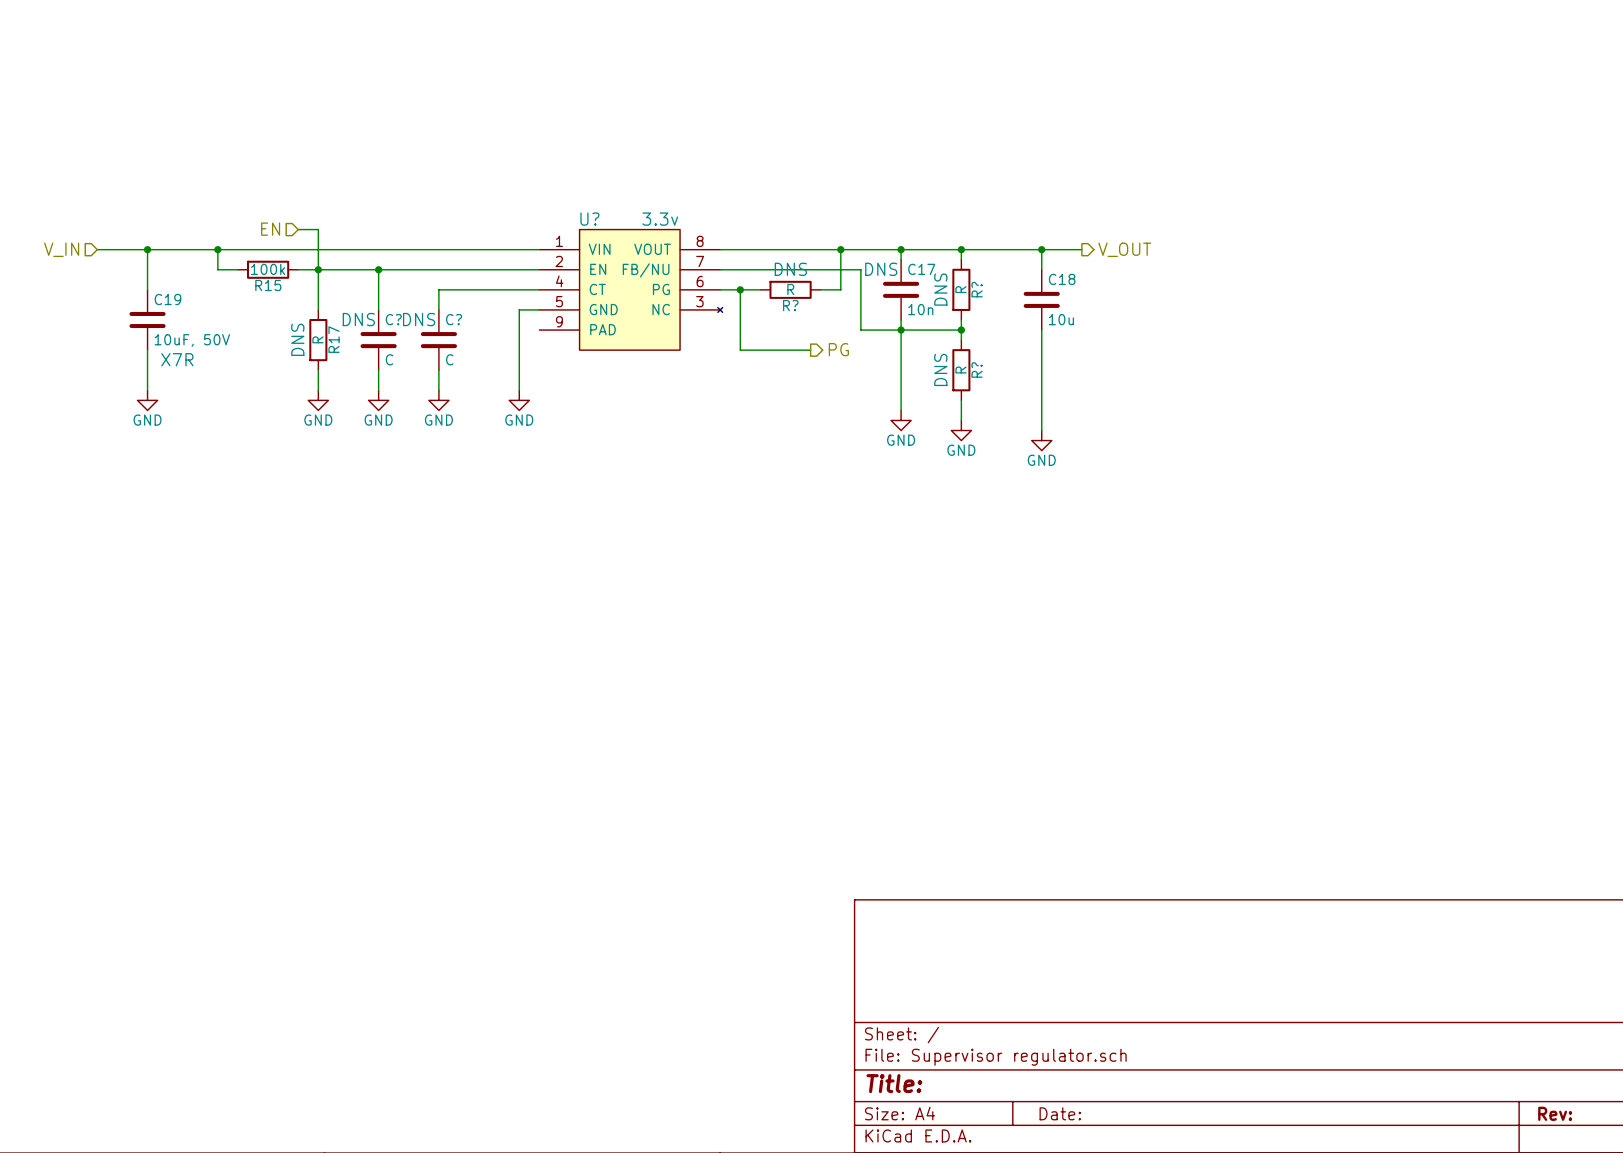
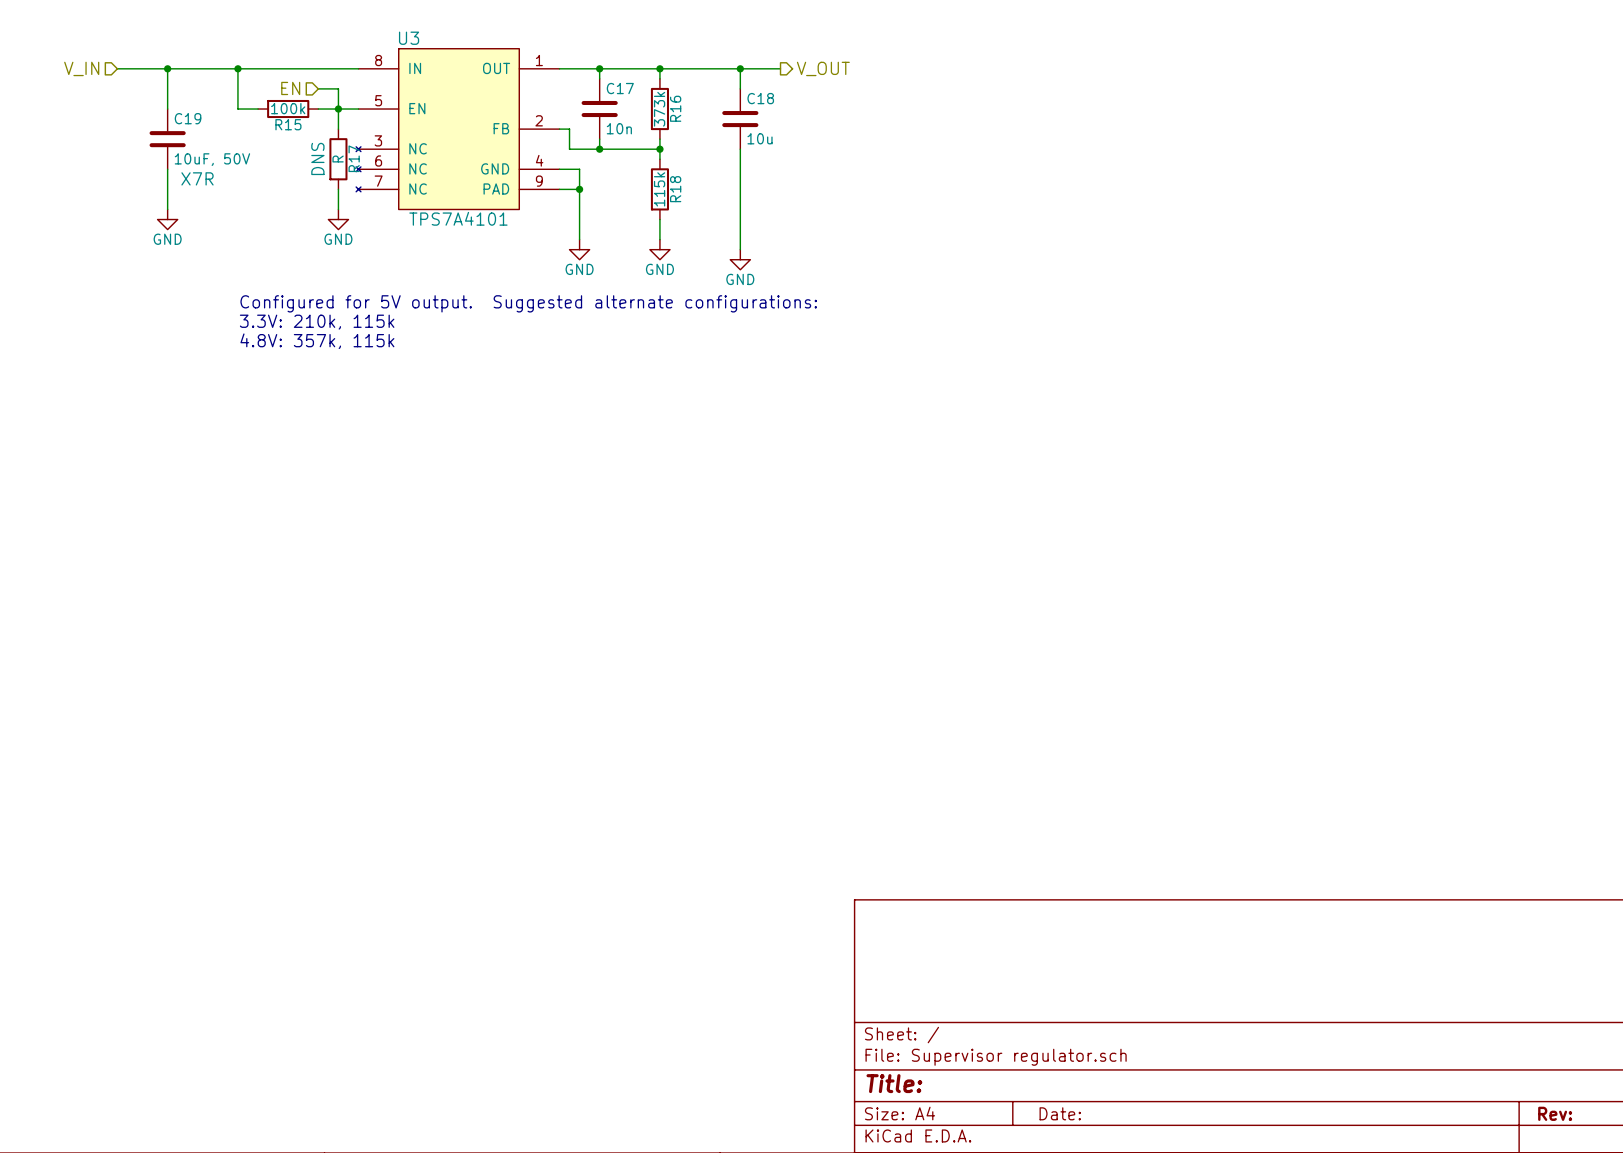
wire: none -> (117, 68) (358, 68)
junction: none -> (167, 68)
wire: none -> (237, 68) (237, 109) (258, 109)
junction: none -> (237, 68)
wire: none -> (559, 68) (780, 68)
wire: none -> (599, 68) (599, 78)
junction: none -> (599, 68)
wire: none -> (659, 68) (659, 78)
junction: none -> (659, 68)
wire: none -> (740, 68) (740, 88)
junction: none -> (740, 68)
hierarchical label: none -> V_OUT (823, 68)
wire: none -> (318, 88) (338, 88) (338, 129)
wire: none -> (318, 109) (358, 109)
junction: none -> (338, 109)
R16: none -> 373k (659, 109)
U3: none -> TPS7A4101 (457, 129)
wire: none -> (559, 129) (569, 129) (569, 149) (659, 149)
wire: none -> (599, 139) (599, 149)
wire: none -> (659, 139) (659, 159)
junction: none -> (599, 149)
junction: none -> (659, 149)
wire: none -> (740, 149) (740, 249)
wire: none -> (559, 169) (579, 169) (579, 239)
wire: none -> (559, 189) (579, 189)
junction: none -> (579, 189)
R18: none -> 115k (659, 189)
power symbol: none -> GND (167, 219)
power symbol: none -> GND (338, 219)
hierarchical label position: EN (270, 229) -> EN (290, 88)
wire: (298, 229) (318, 229) (318, 309) -> none
hierarchical label position: V_IN (61, 249) -> V_IN (81, 68)
wire: (97, 249) (539, 249) -> none
wire: (147, 249) (147, 289) -> (167, 68) (167, 109)
junction: (147, 249) -> none
wire: (217, 249) (217, 269) (237, 269) -> none
junction: (217, 249) -> none
power symbol: none -> GND (579, 249)
power symbol: none -> GND (659, 249)
wire: (720, 249) (1081, 249) -> none
wire: (840, 249) (840, 289) (820, 289) -> none
junction: (840, 249) -> none
wire: (901, 249) (901, 259) -> none
junction: (901, 249) -> none
wire: (961, 249) (961, 259) -> none
junction: (961, 249) -> none
wire: (1041, 249) (1041, 269) -> none
junction: (1041, 249) -> none
hierarchical label: V_OUT (1124, 249) -> none
power symbol: none -> GND (740, 259)
R15 position: (268, 269) -> (288, 109)
wire: (298, 269) (539, 269) -> none
junction: (318, 269) -> none
wire: (378, 269) (378, 309) -> none
junction: (378, 269) -> none
wire: (720, 269) (860, 269) (860, 330) (961, 330) -> none
C17 text: DNS (881, 269) -> none
wire: (539, 289) (438, 289) (438, 309) -> none
U?: 3.3v (630, 289) -> none
wire: (720, 289) (760, 289) -> none
wire: (740, 289) (740, 350) (810, 350) -> none
junction: (740, 289) -> none
R?: R (790, 289) -> none
C17 position: (901, 289) -> (599, 109)
R?: R (961, 289) -> none
C18 position: (1041, 299) -> (740, 119)
text: none -> Configured for 5V output. Suggested alternate configurations: (528, 303)
wire: (539, 309) (519, 309) (519, 390) -> none
C19 position: (147, 320) -> (167, 139)
wire: (901, 320) (901, 410) -> none
wire: (961, 320) (961, 340) -> none
text: none -> 3.3V: 210k, 115k (317, 322)
junction: (901, 330) -> none
junction: (961, 330) -> none
wire: (1041, 330) (1041, 430) -> none
R17 position: (318, 340) -> (338, 159)
C?: C (378, 340) -> none
C?: C (438, 340) -> none
text: none -> 4.8V: 357k, 115k (317, 341)
hierarchical label: PG (838, 349) -> none
wire: (147, 350) (147, 390) -> (167, 169) (167, 209)
wire: (318, 370) (318, 390) -> (338, 189) (338, 209)
wire: (378, 370) (378, 390) -> none
wire: (438, 370) (438, 390) -> none
R?: R (961, 370) -> none
power symbol: GND (147, 400) -> none
power symbol: GND (318, 400) -> none
power symbol: GND (378, 400) -> none
power symbol: GND (438, 400) -> none
power symbol: GND (519, 400) -> none
wire: (961, 400) (961, 420) -> none
power symbol: GND (901, 420) -> none
power symbol: GND (961, 430) -> none
power symbol: GND (1041, 440) -> none

